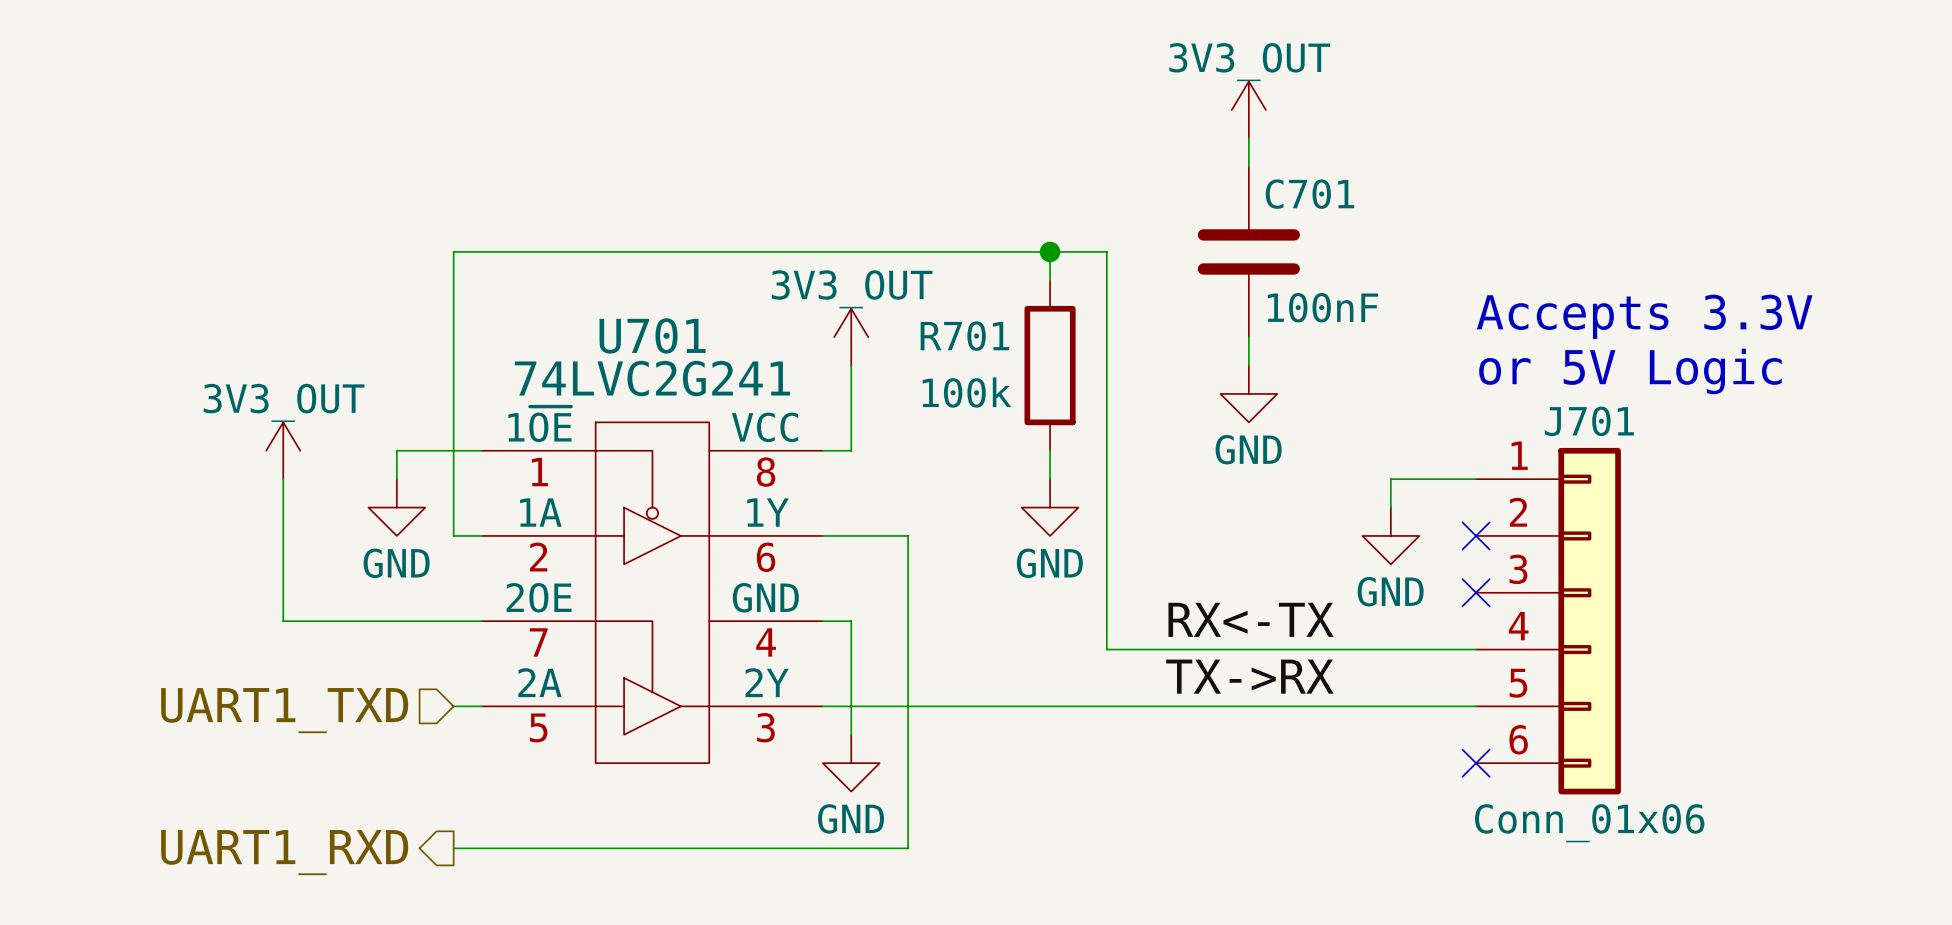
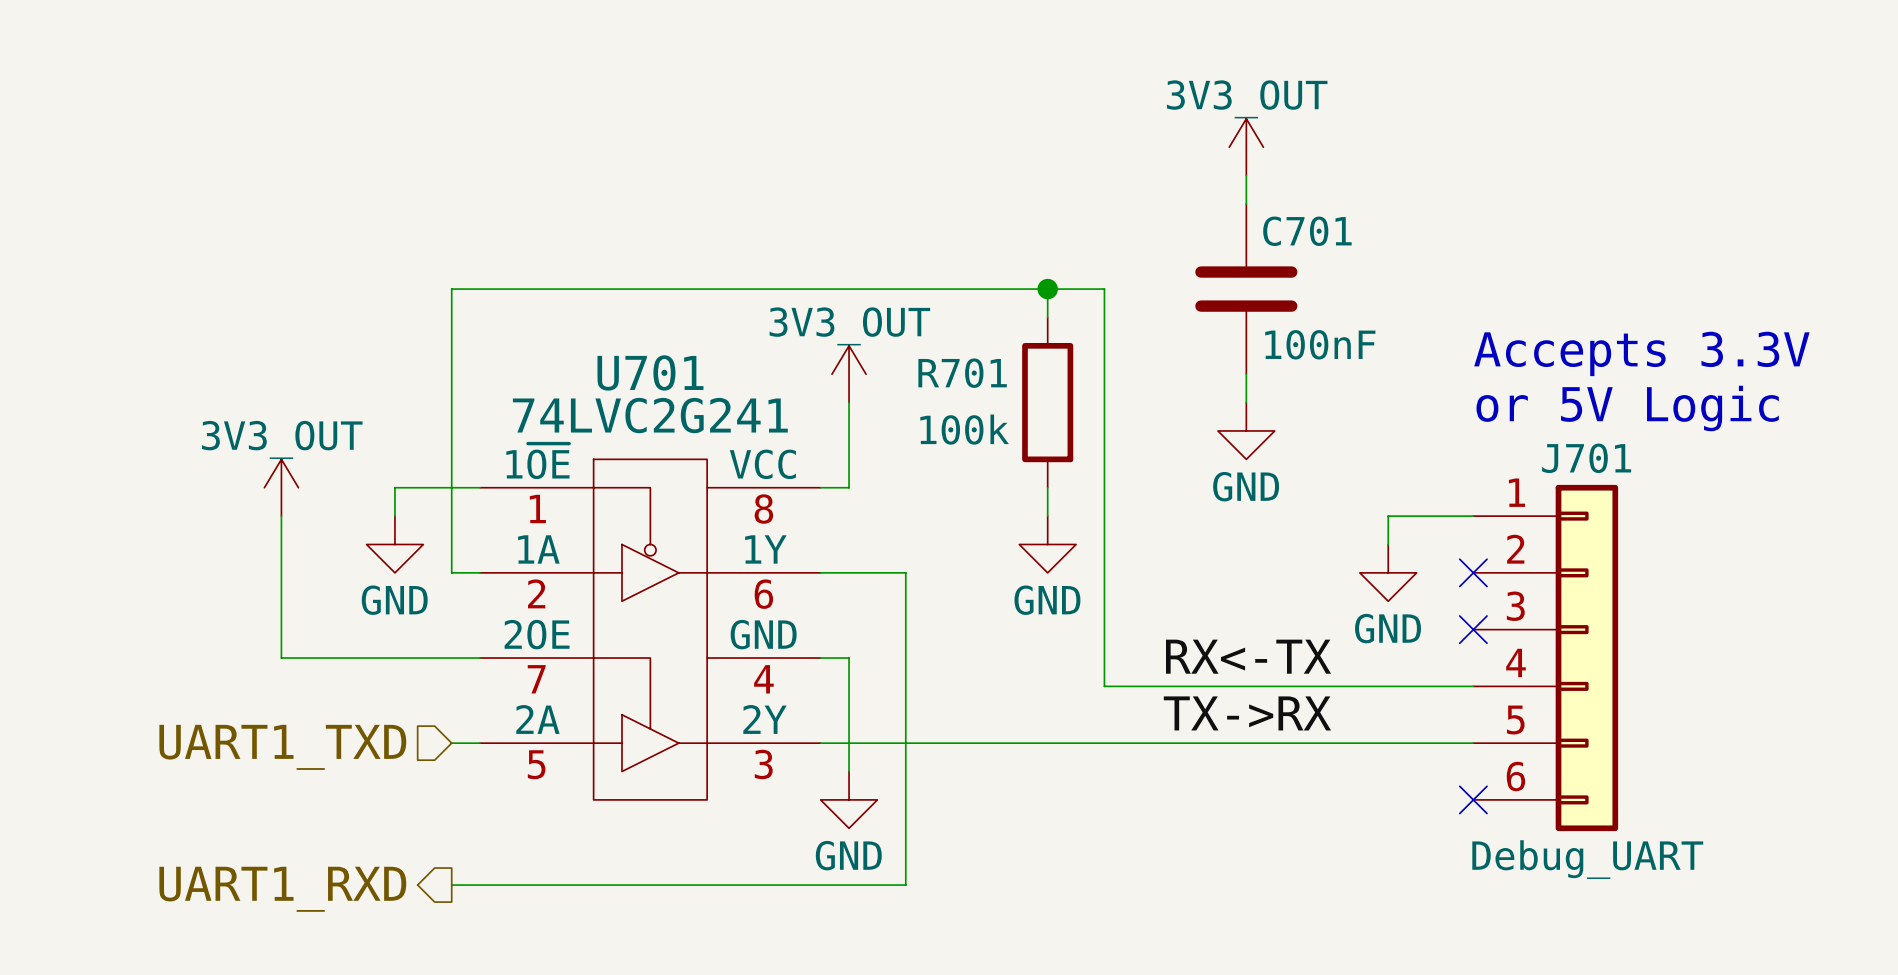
J701 value: Conn_01x06 (1589, 823) -> Debug_UART (1587, 859)

